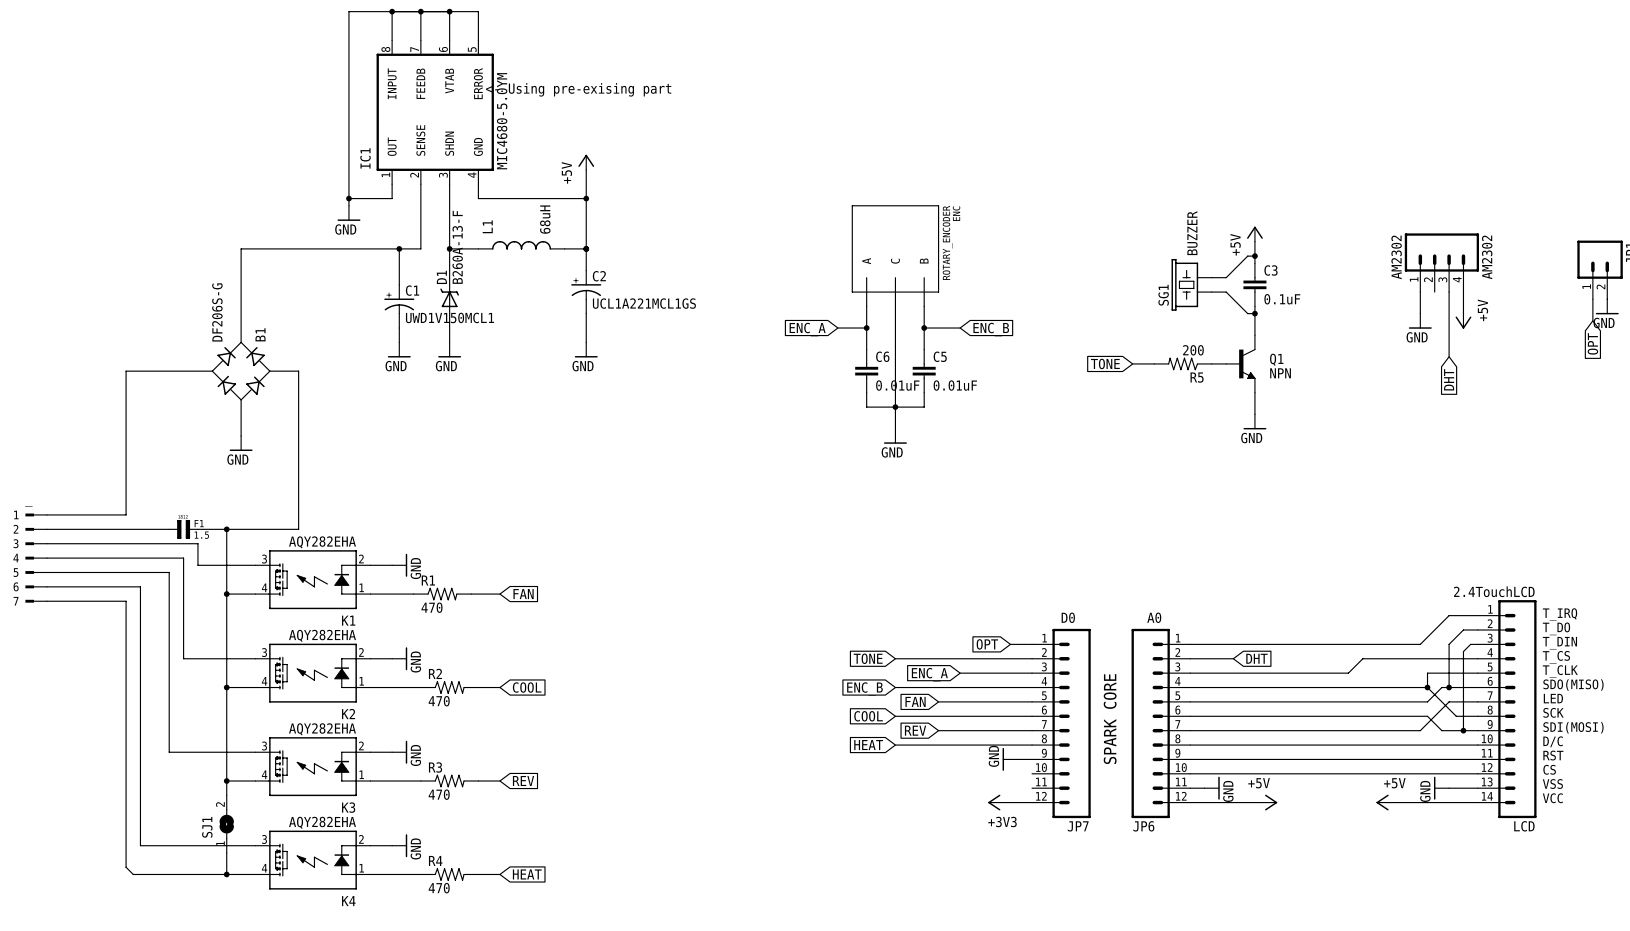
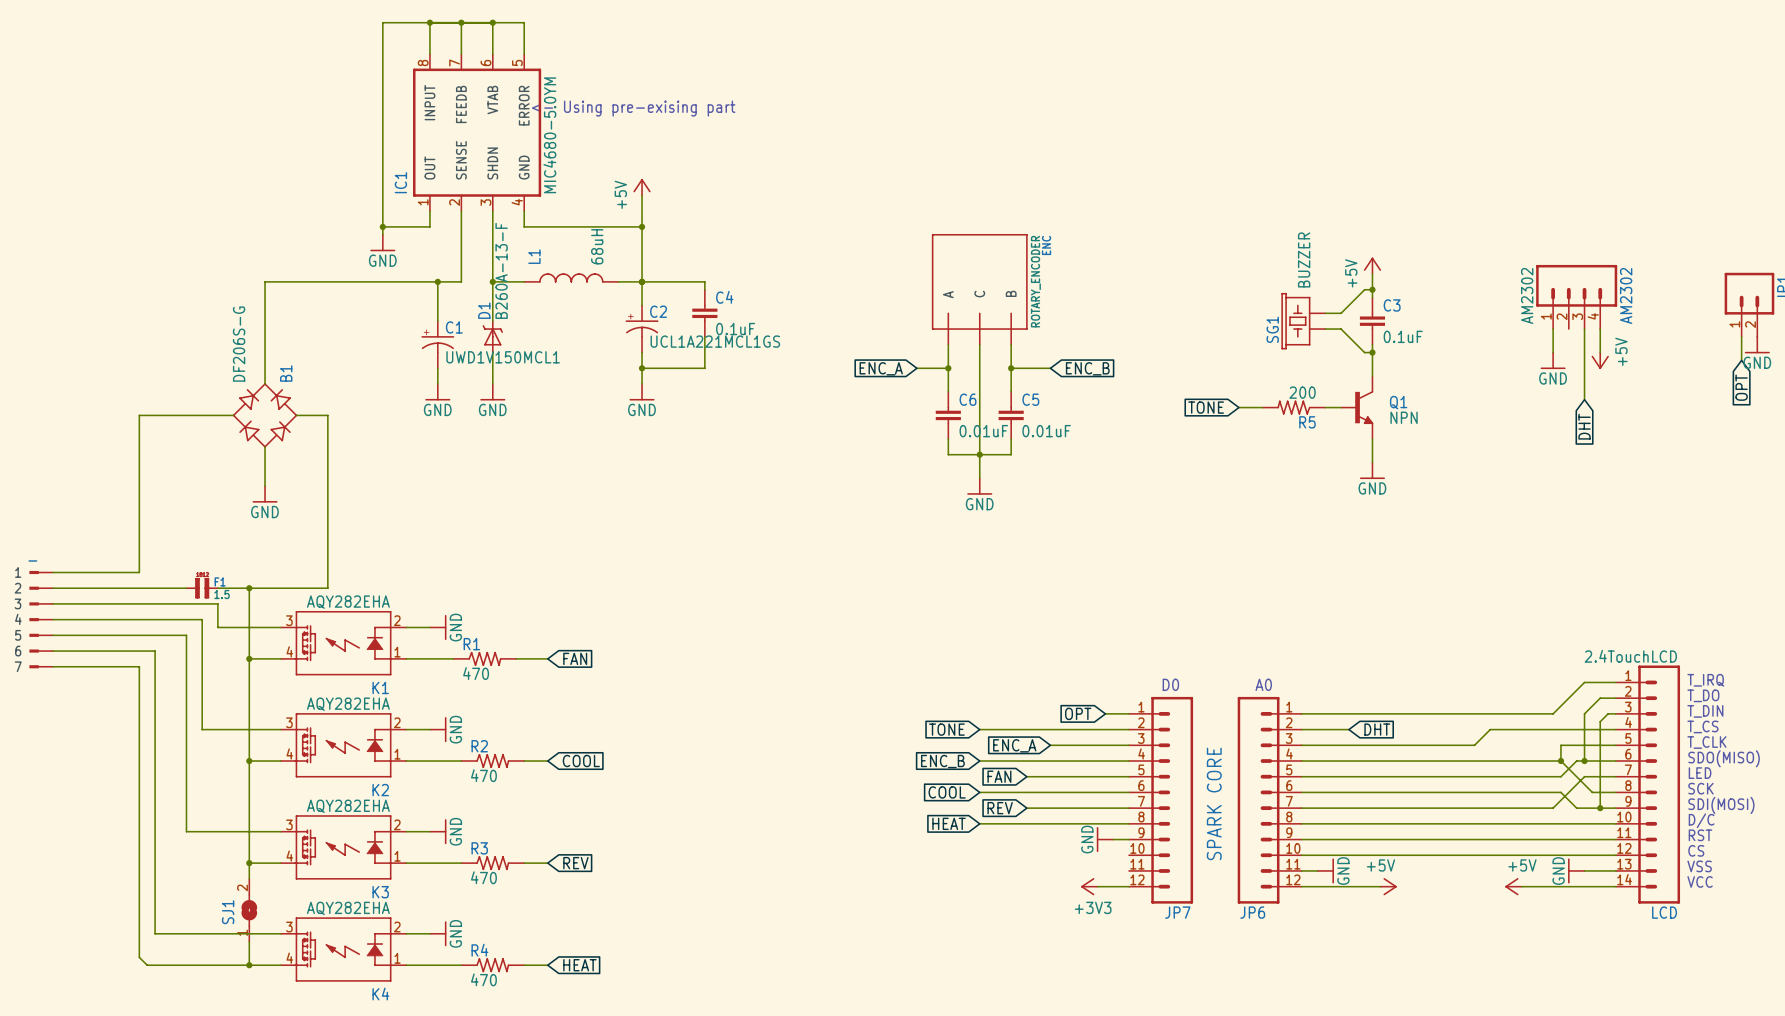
wire: none -> (642, 281) (704, 281) (704, 289)
C4: none -> 0.1uF (704, 313)
wire: none -> (704, 336) (704, 368) (642, 368)
junction: none -> (642, 368)

